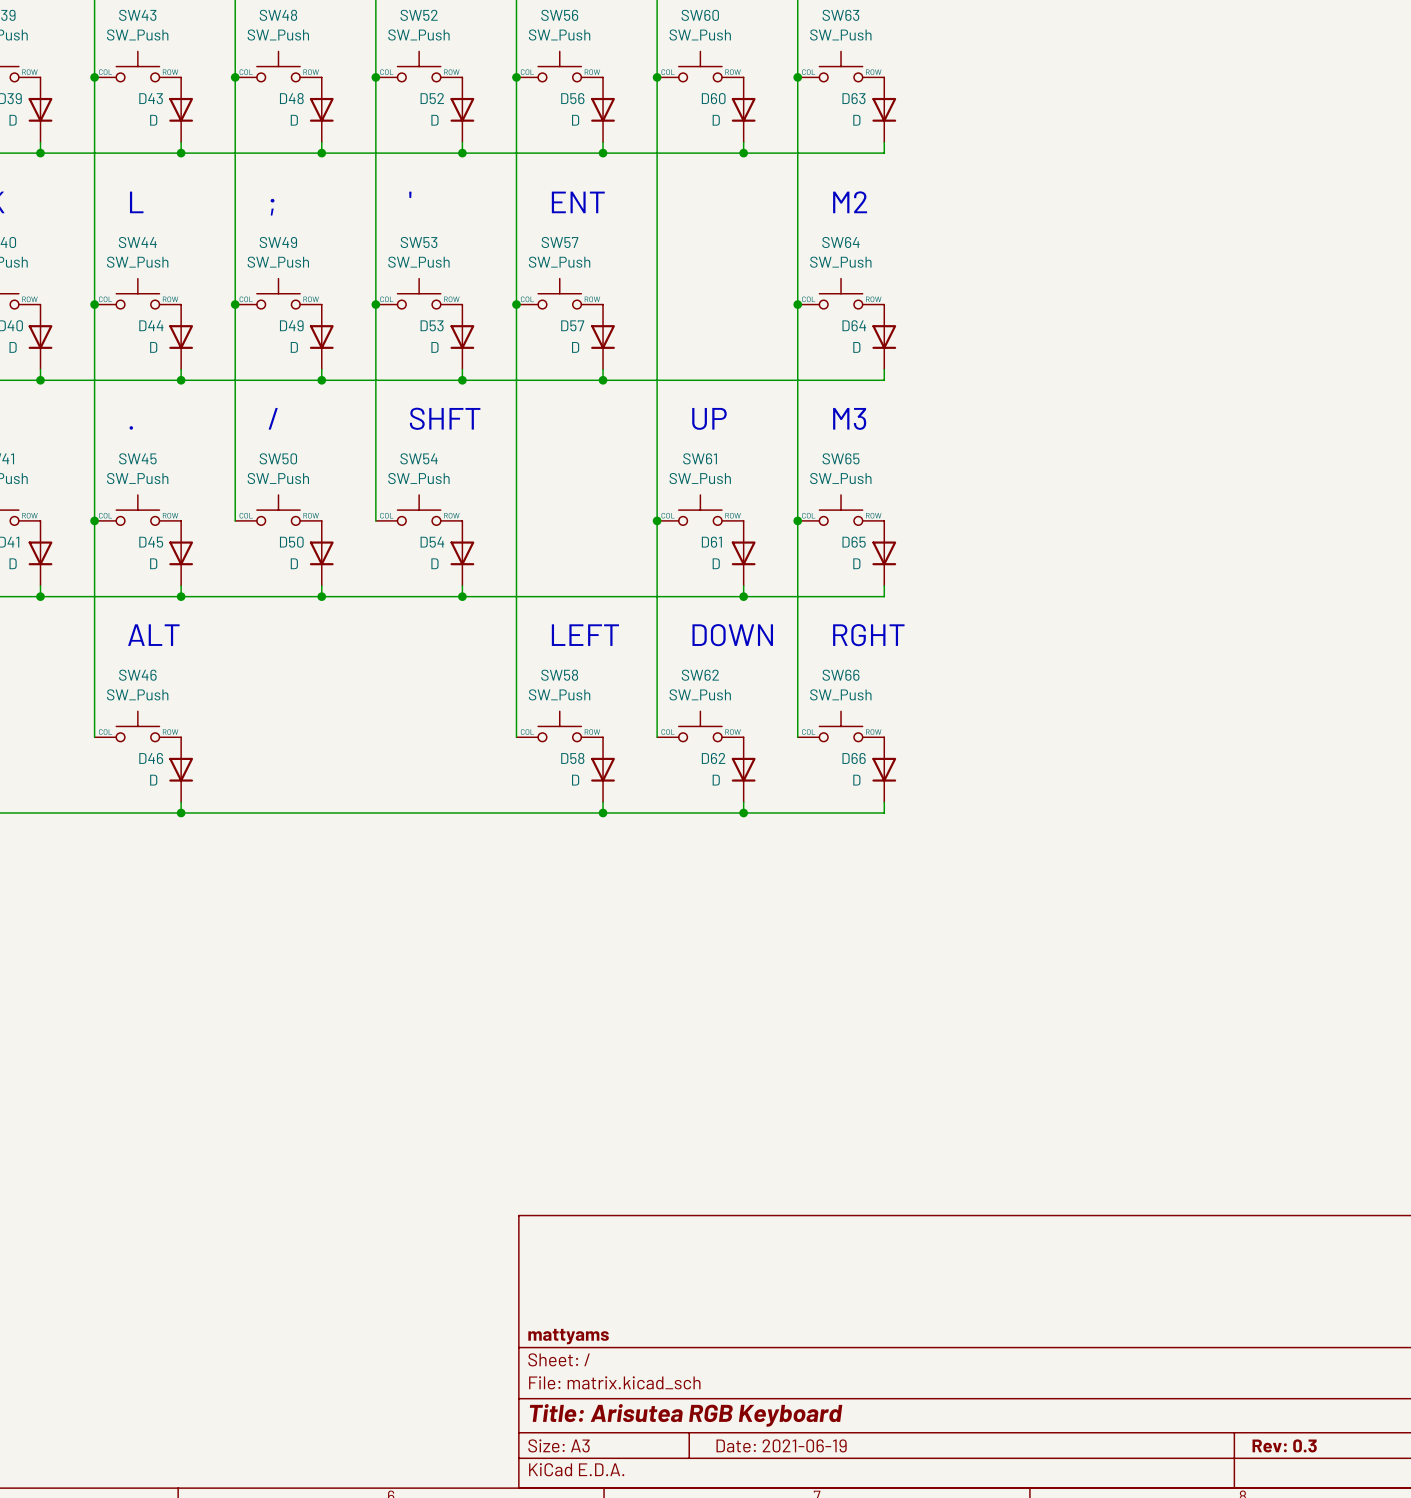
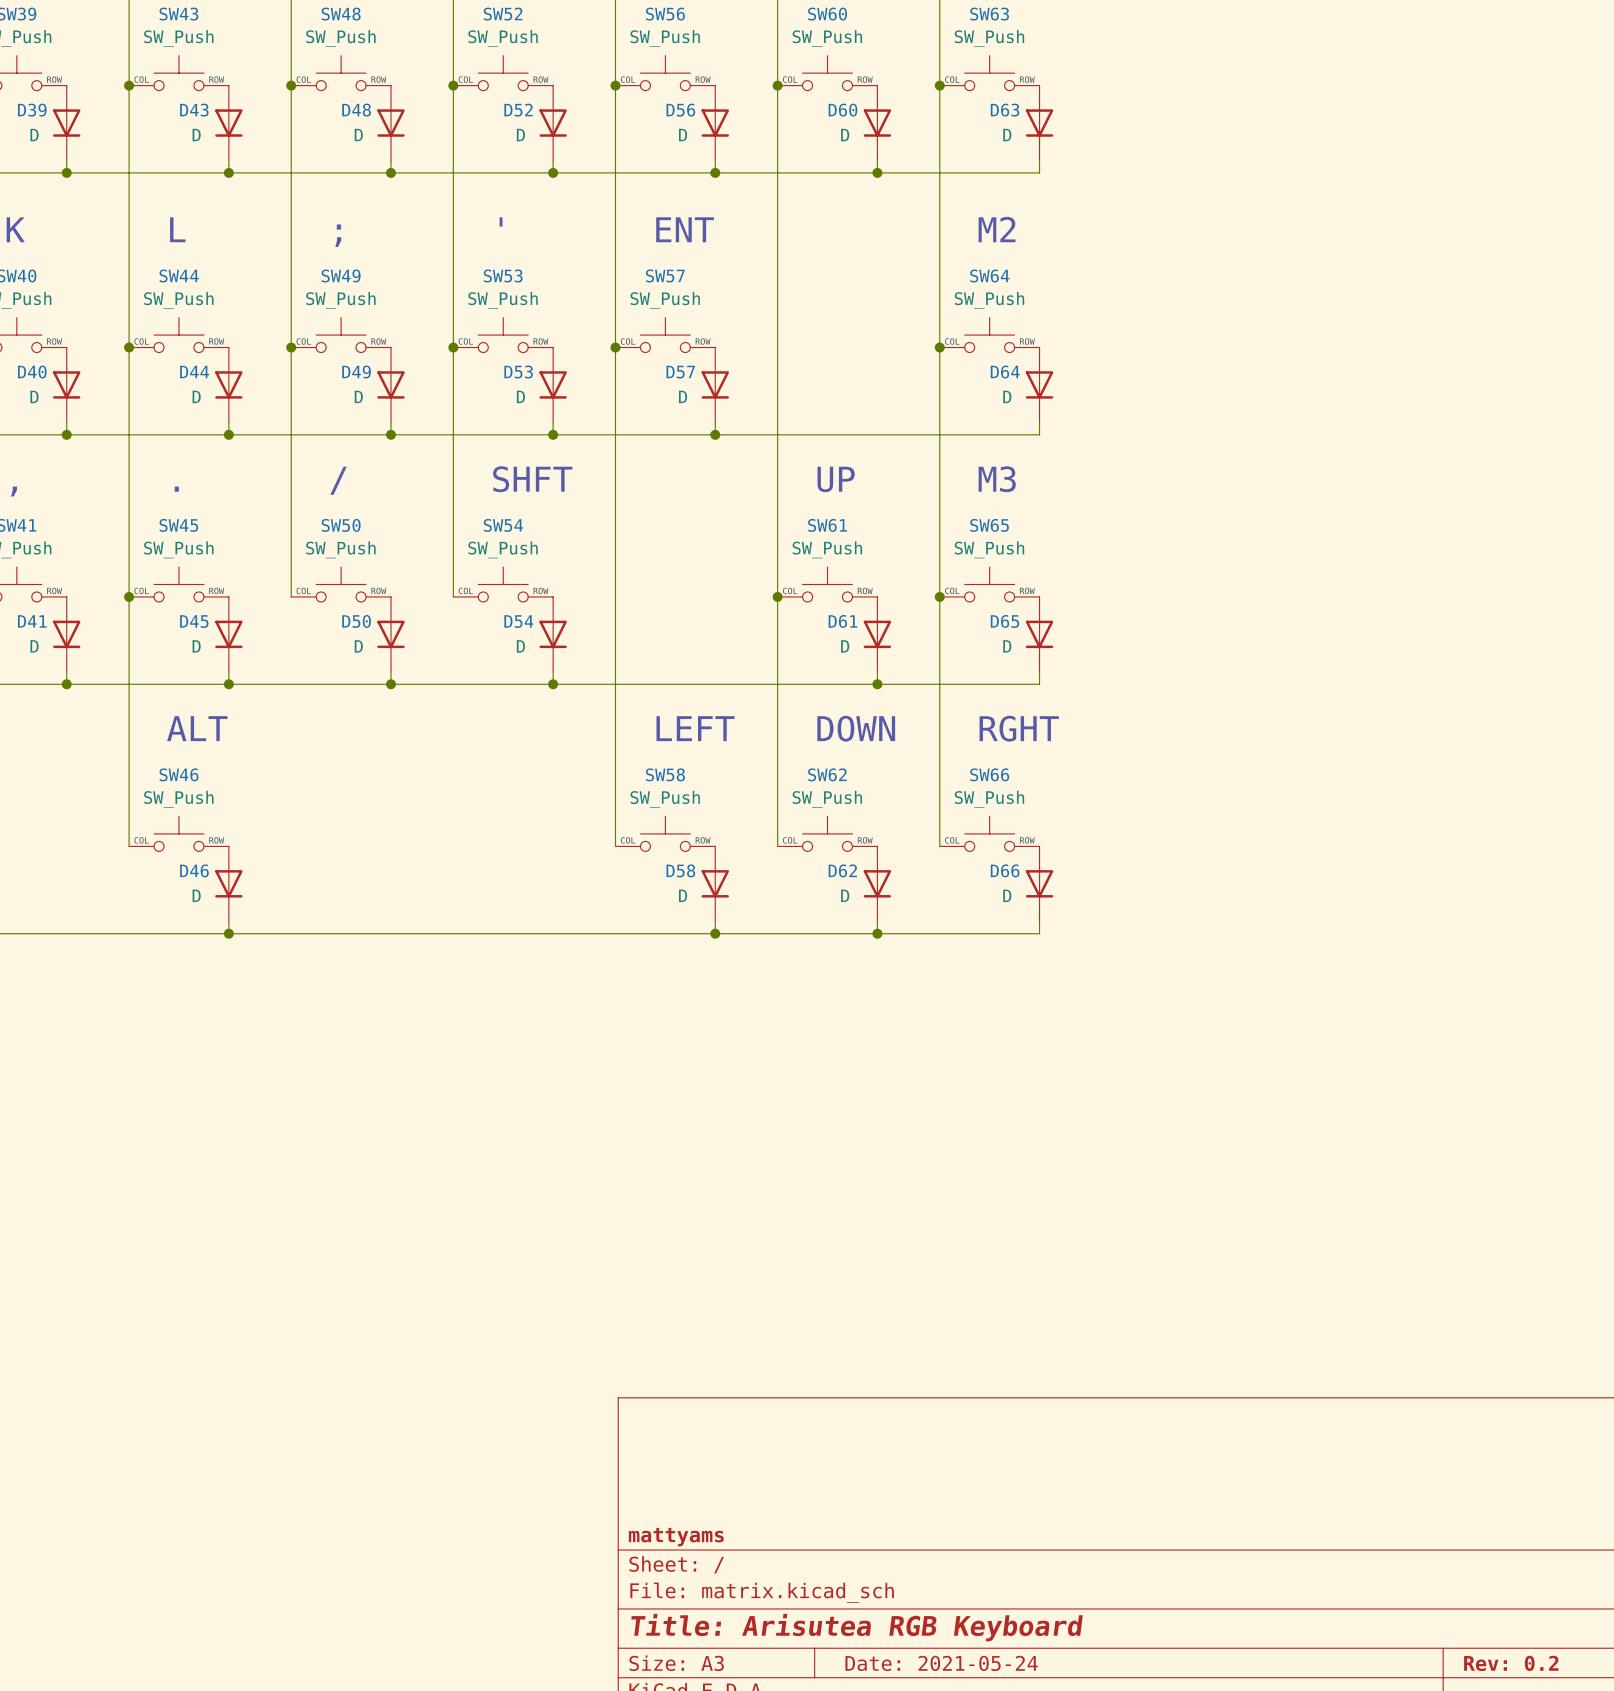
title block: Date: 2021-06-19 (781, 1445) -> Date: 2021-05-24 (941, 1663)
title block: Rev: 0.3 (1284, 1445) -> Rev: 0.2 (1511, 1663)

